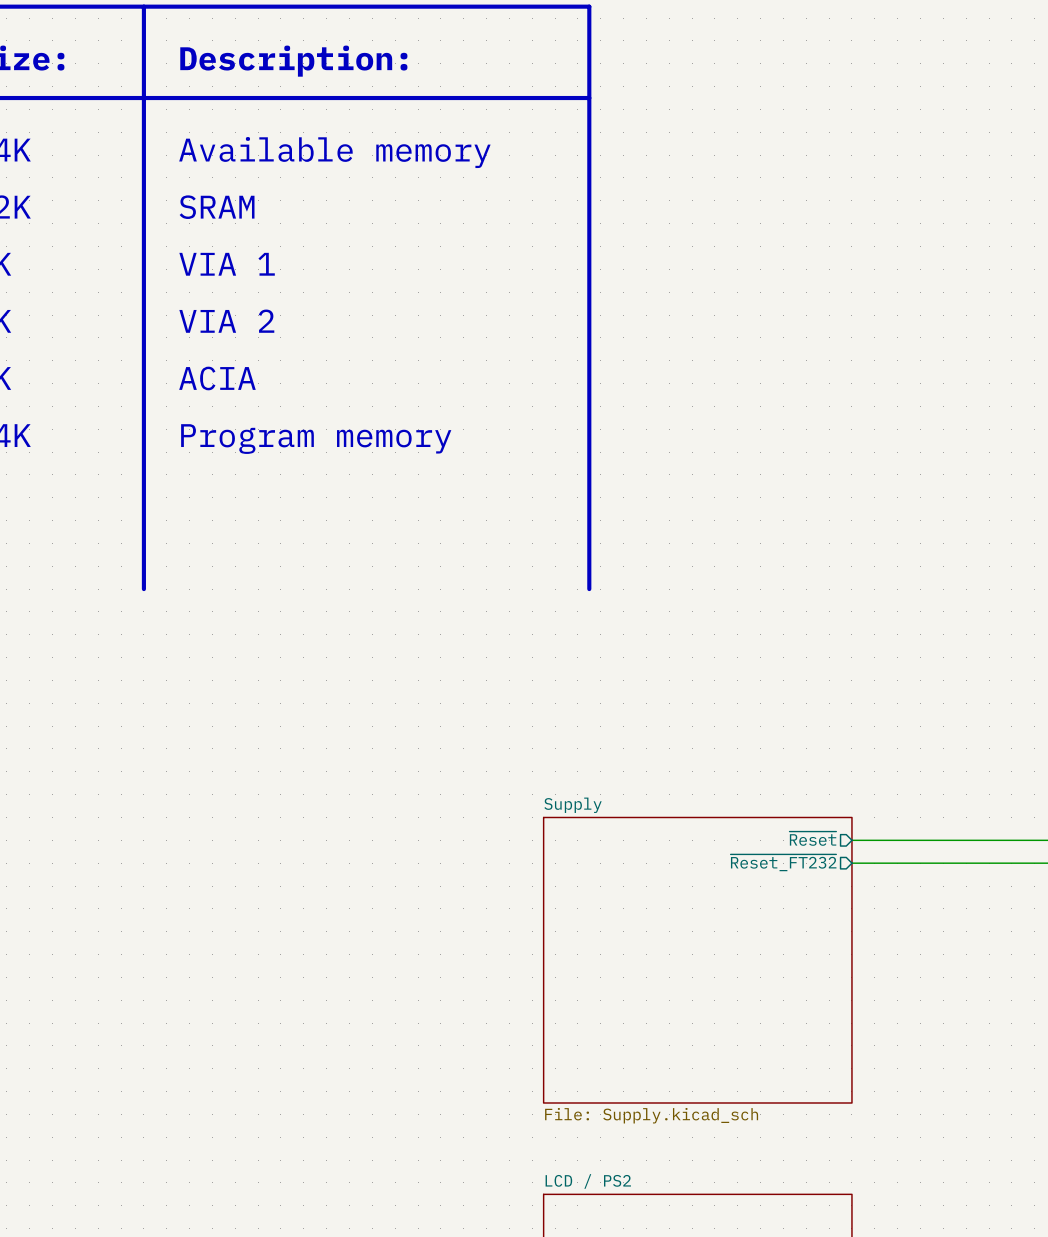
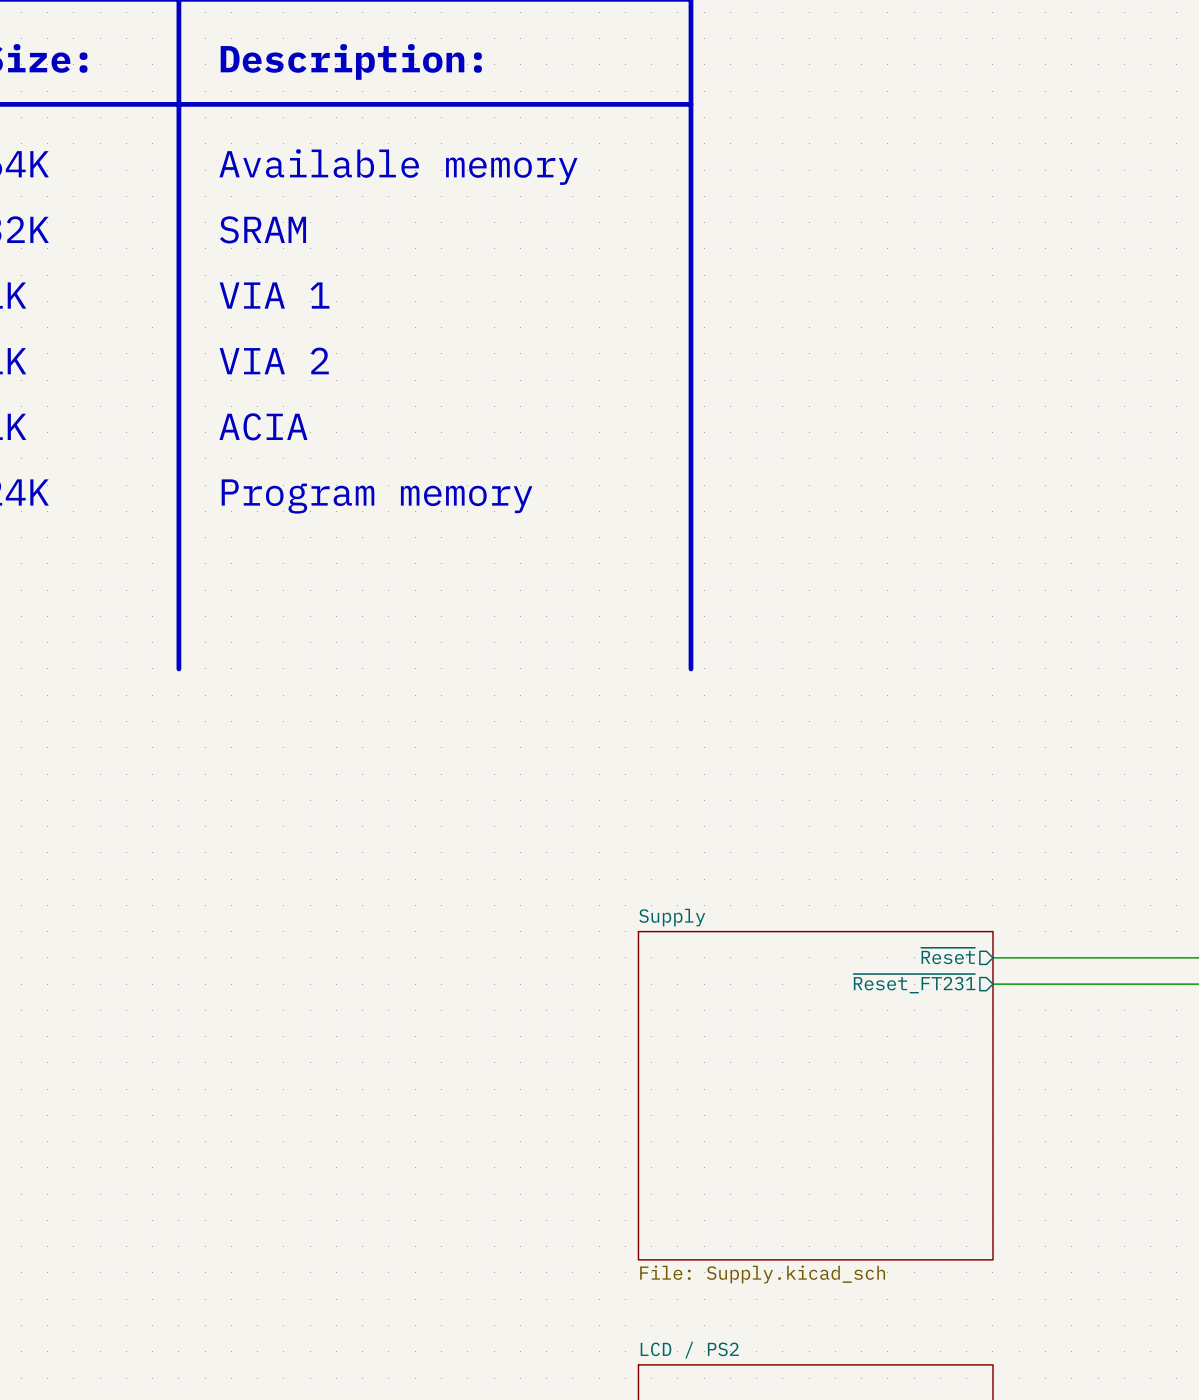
sheet pin: ~{Reset_FT232} (783, 862) -> ~{Reset_FT231} (914, 983)

